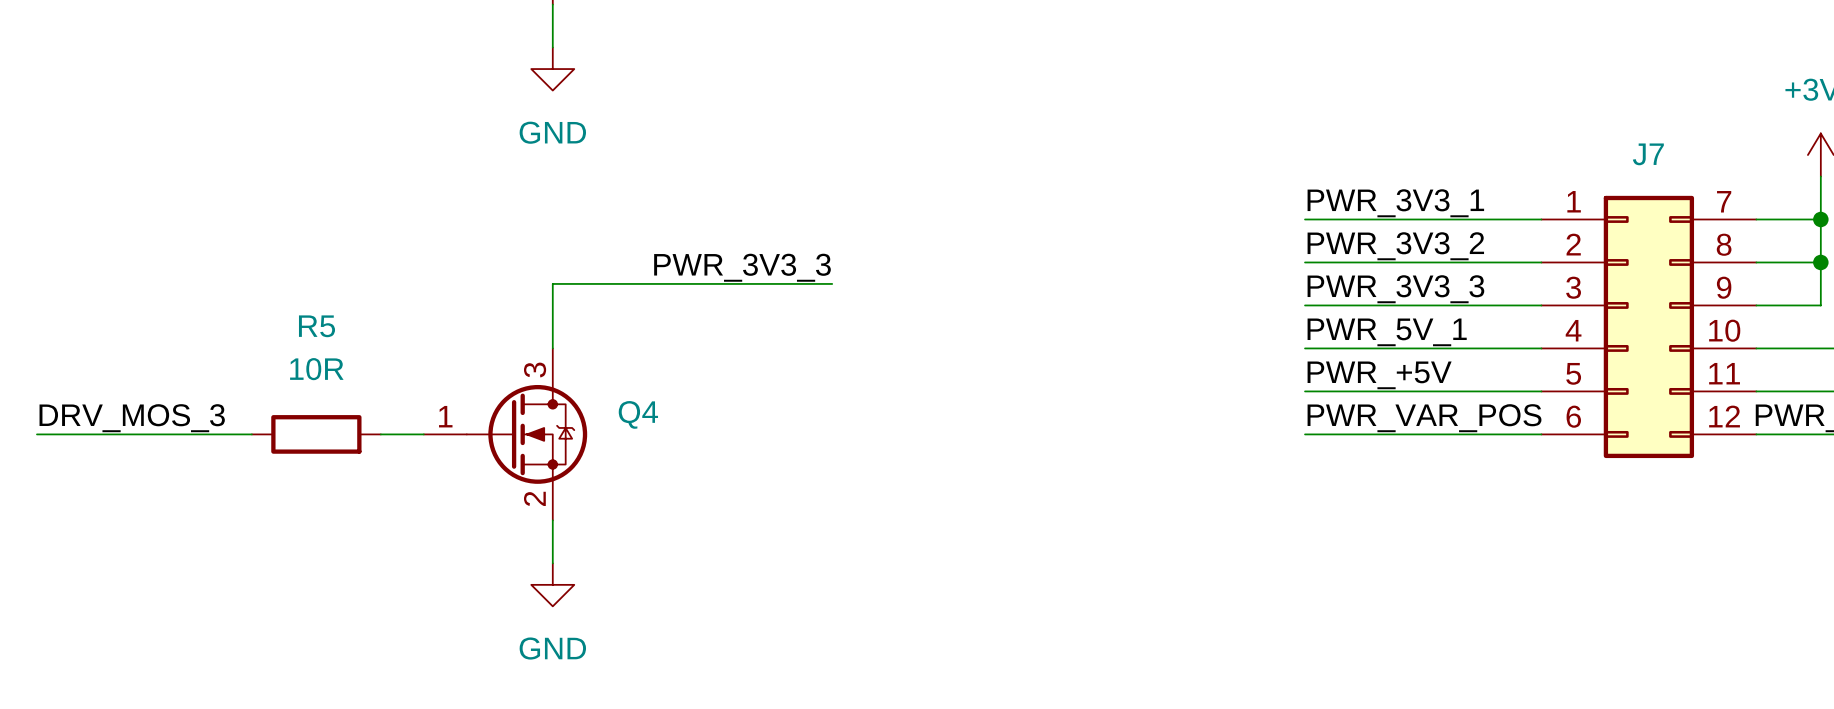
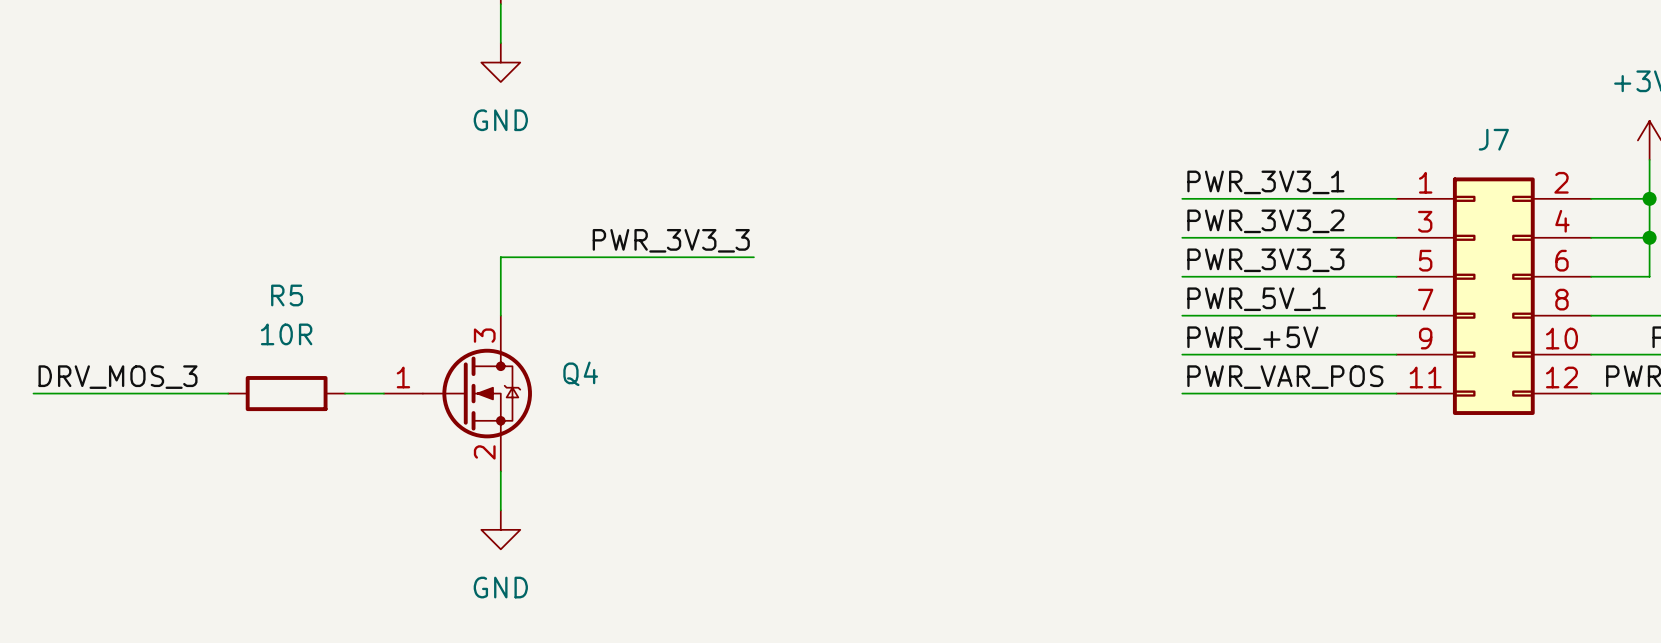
J7 symbol: [1541, 195, 1757, 459] -> [1396, 177, 1592, 415]

